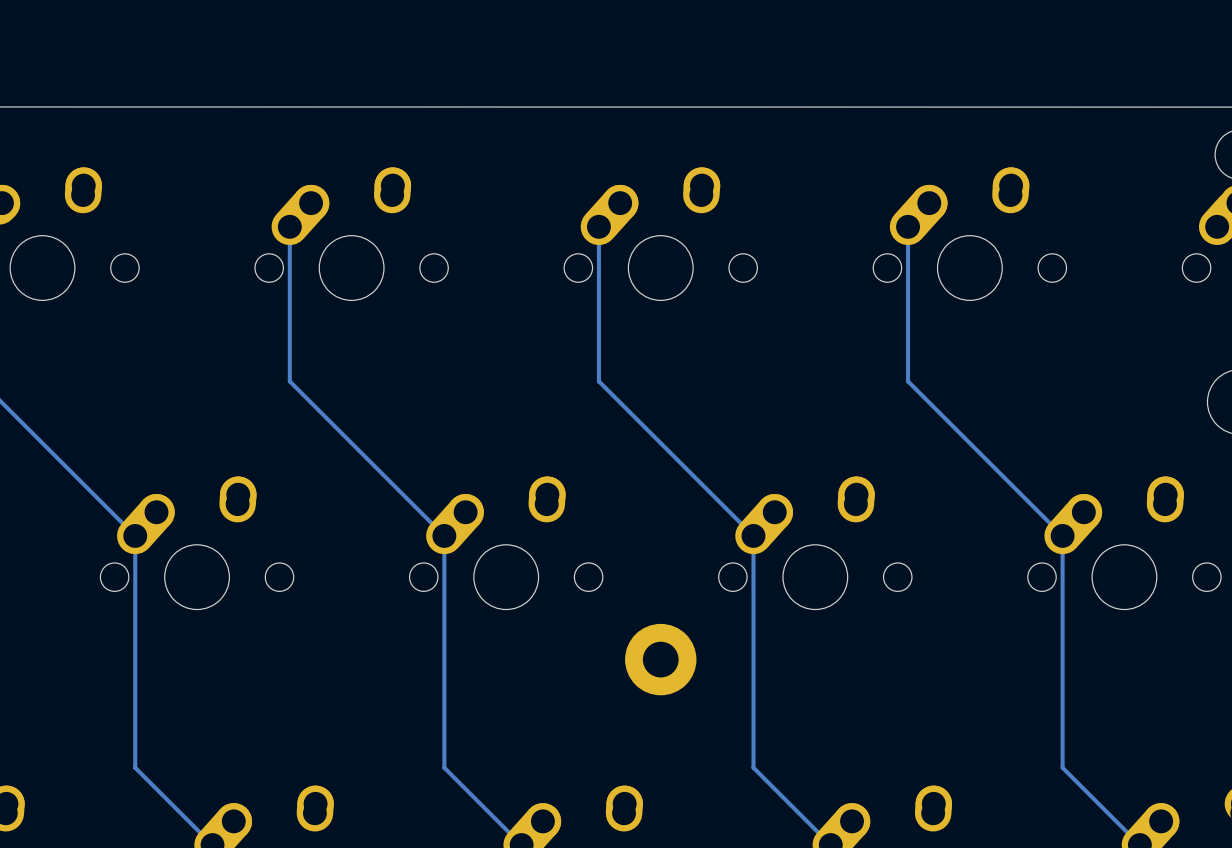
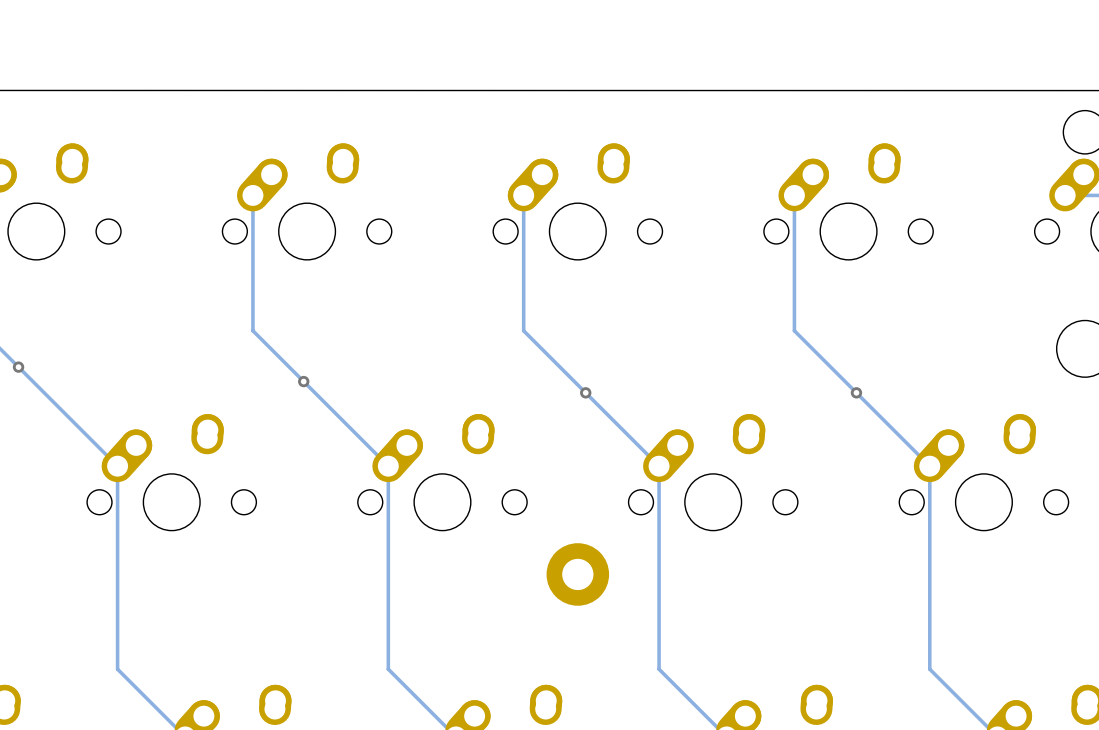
via: none -> (18, 367)
via: none -> (303, 381)
via: none -> (585, 392)
via: none -> (856, 392)

